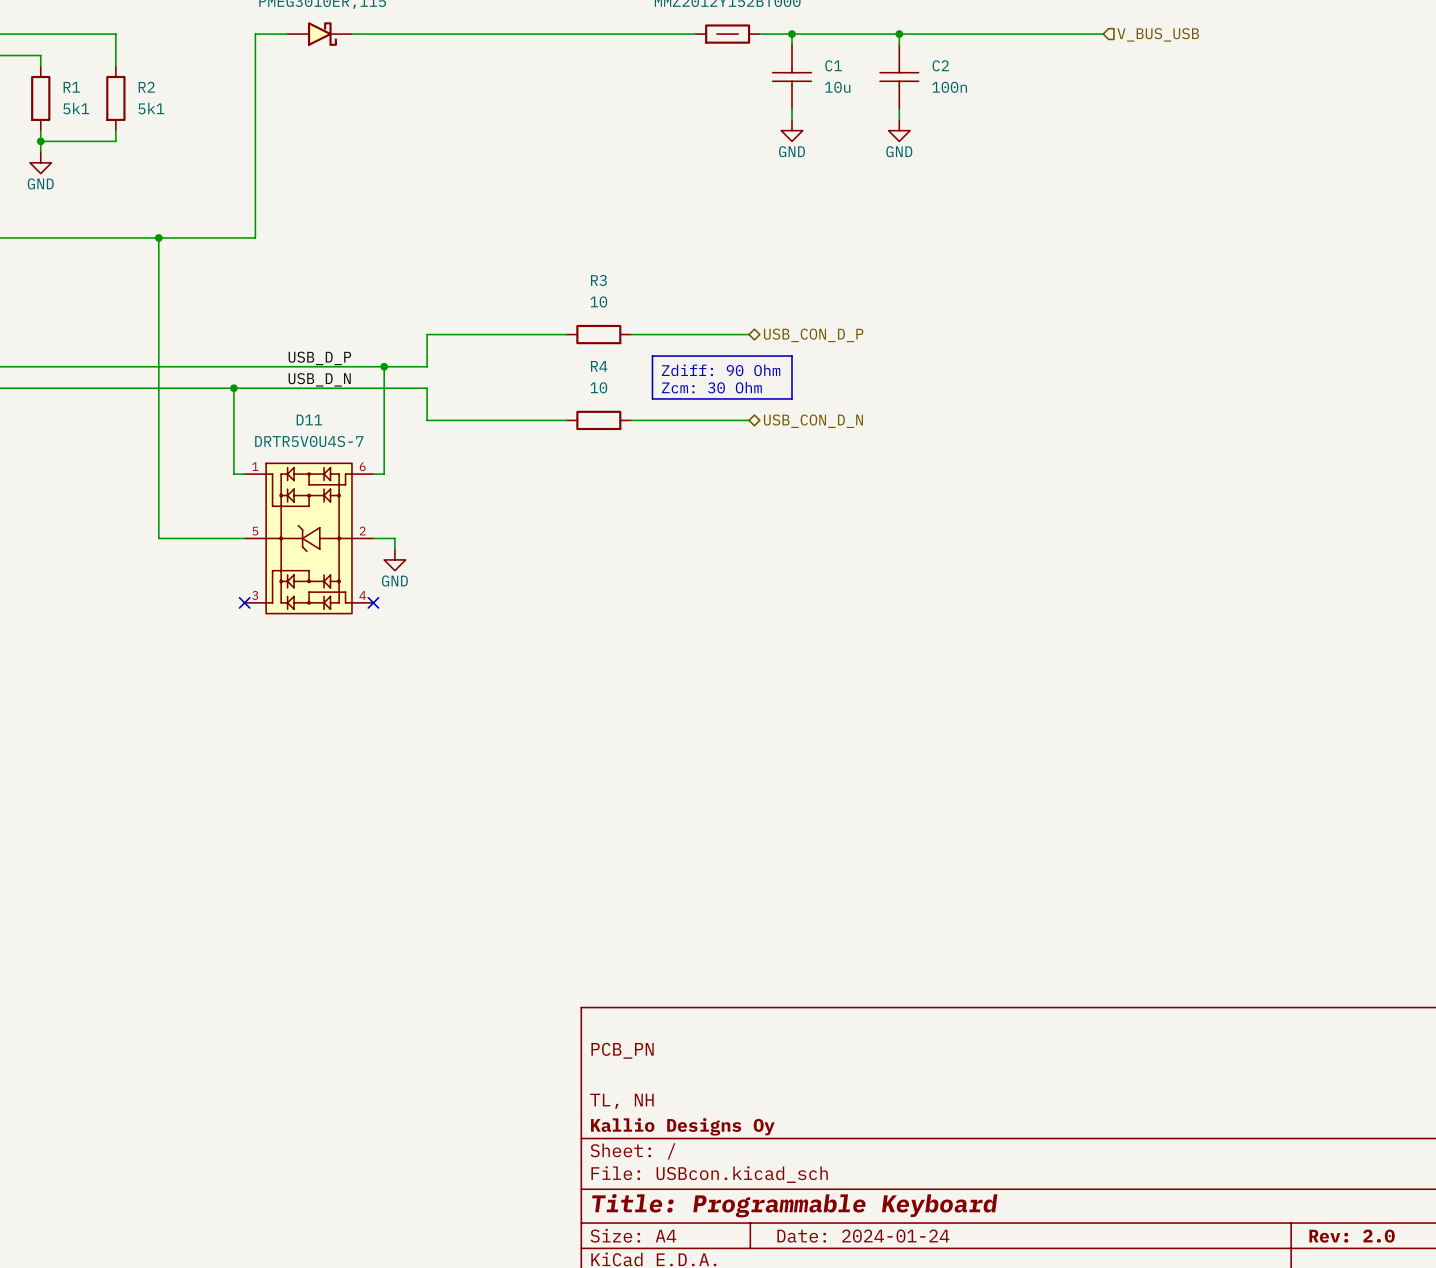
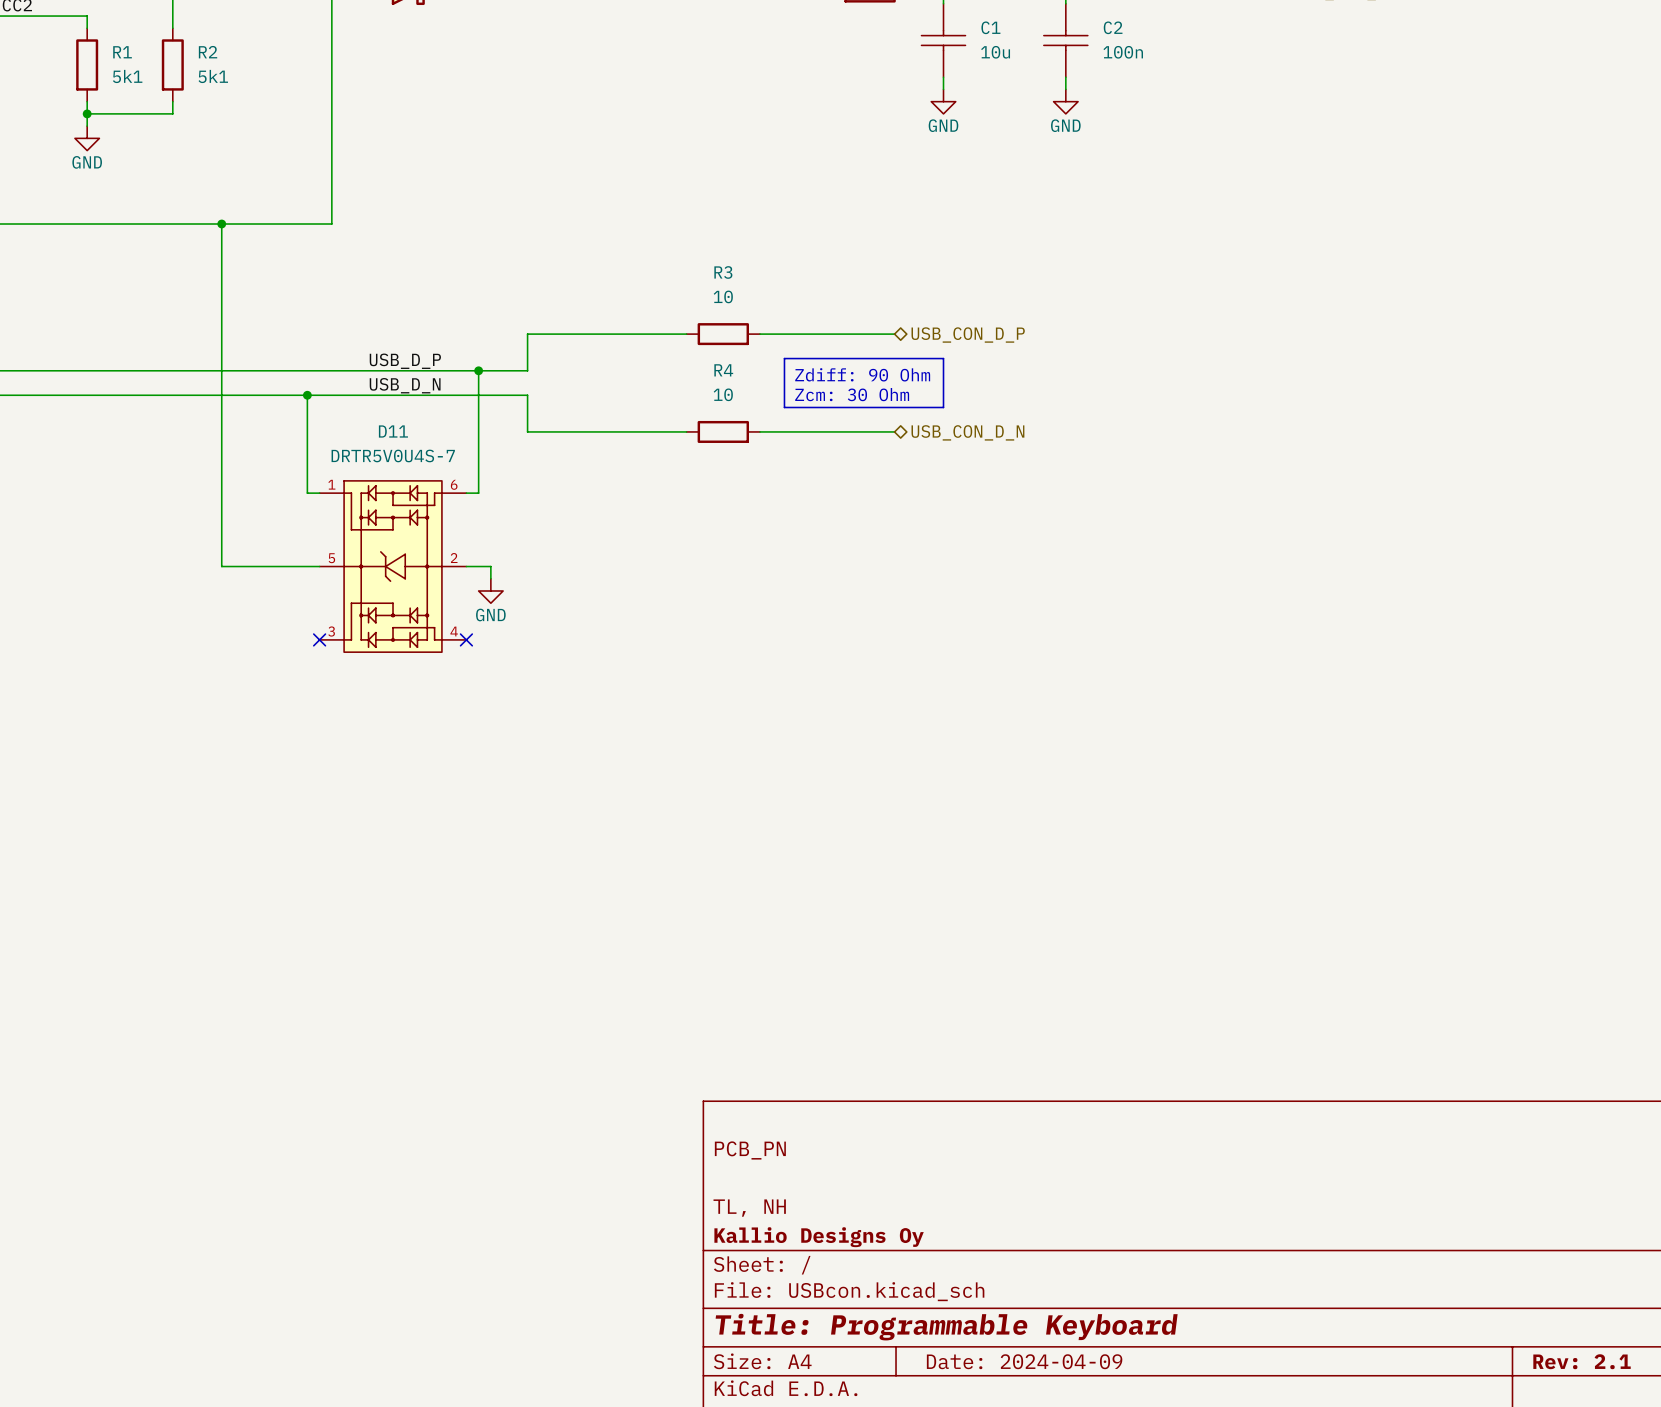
title block: Date: 2024-01-24 (863, 1236) -> Date: 2024-04-09 (1024, 1361)
title block: Rev: 2.0 (1352, 1236) -> Rev: 2.1 (1582, 1361)

